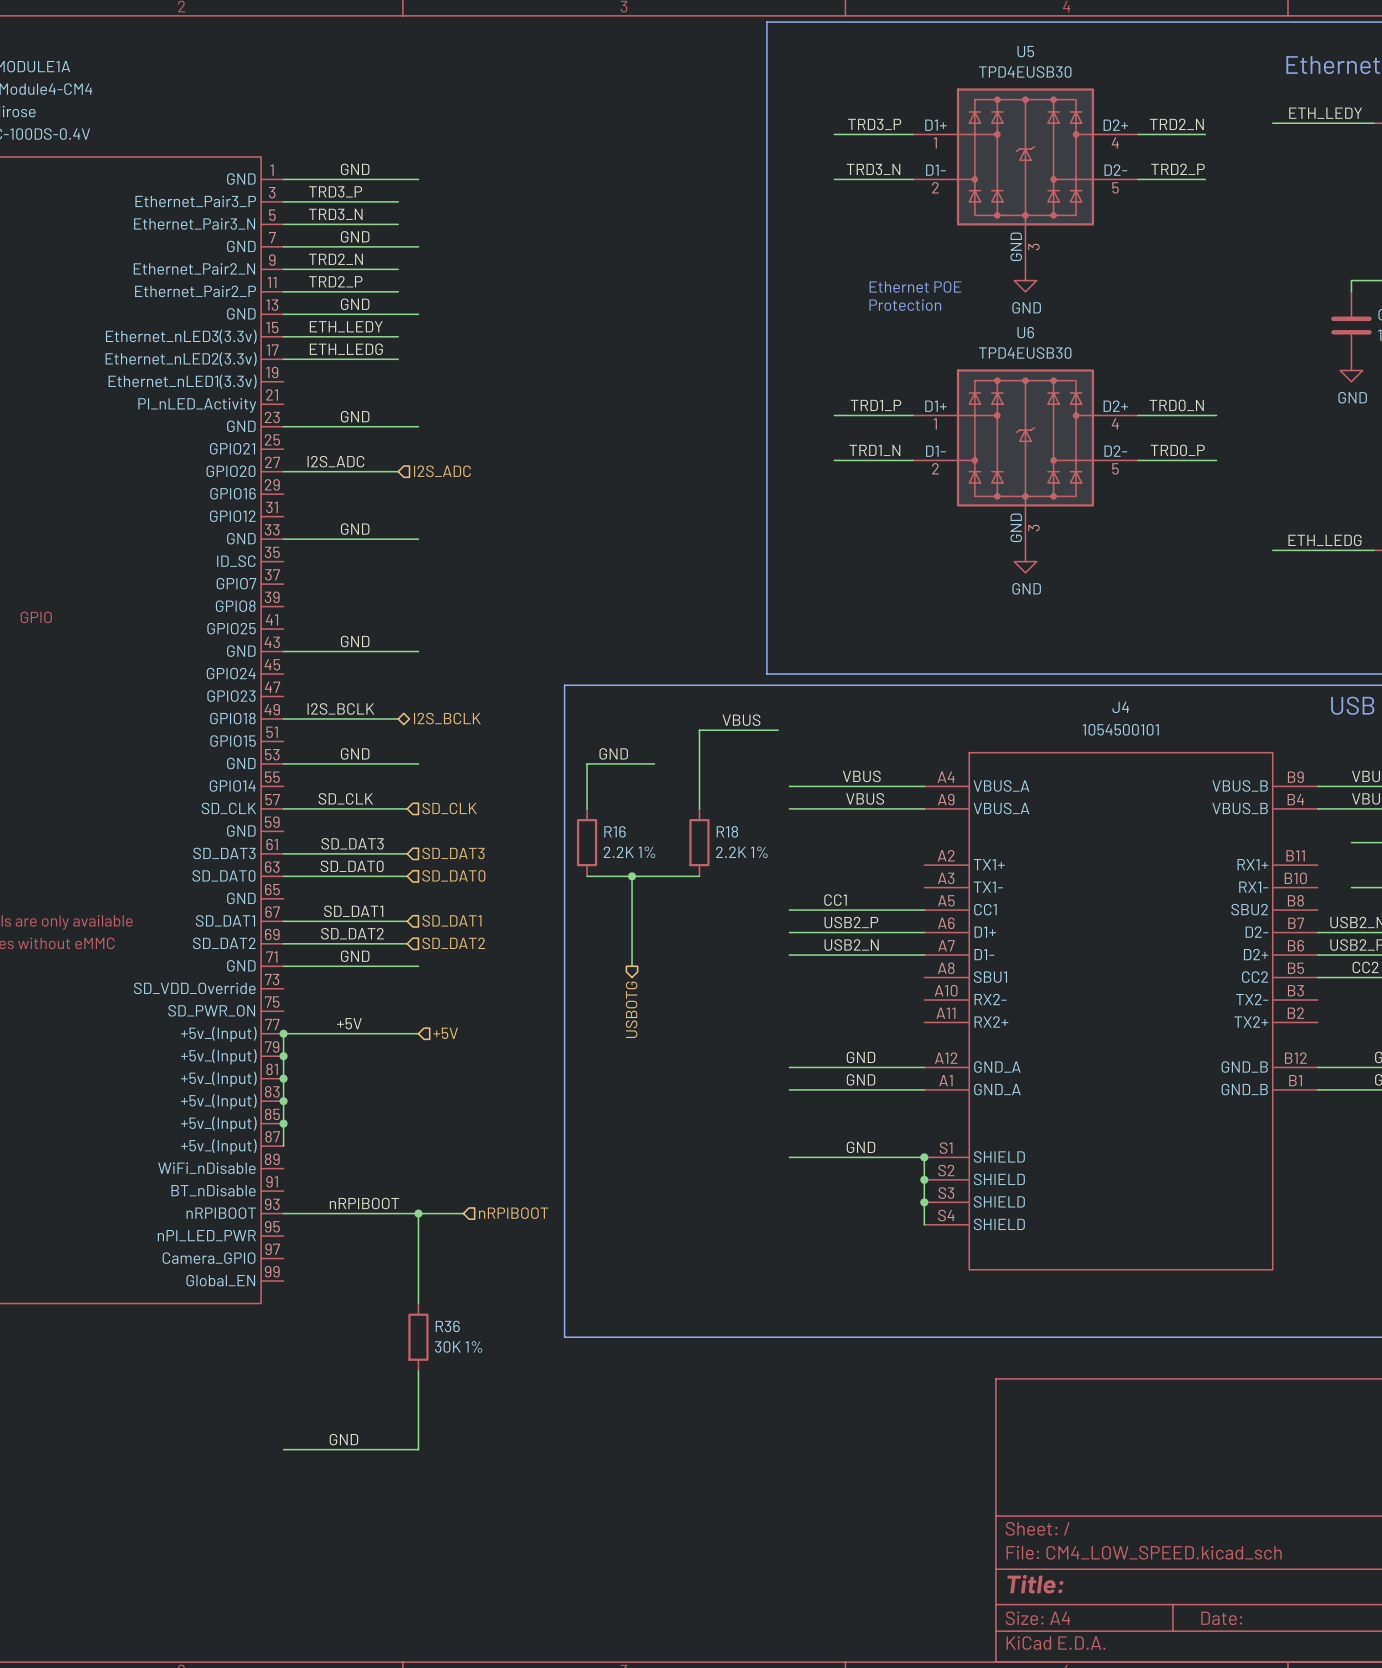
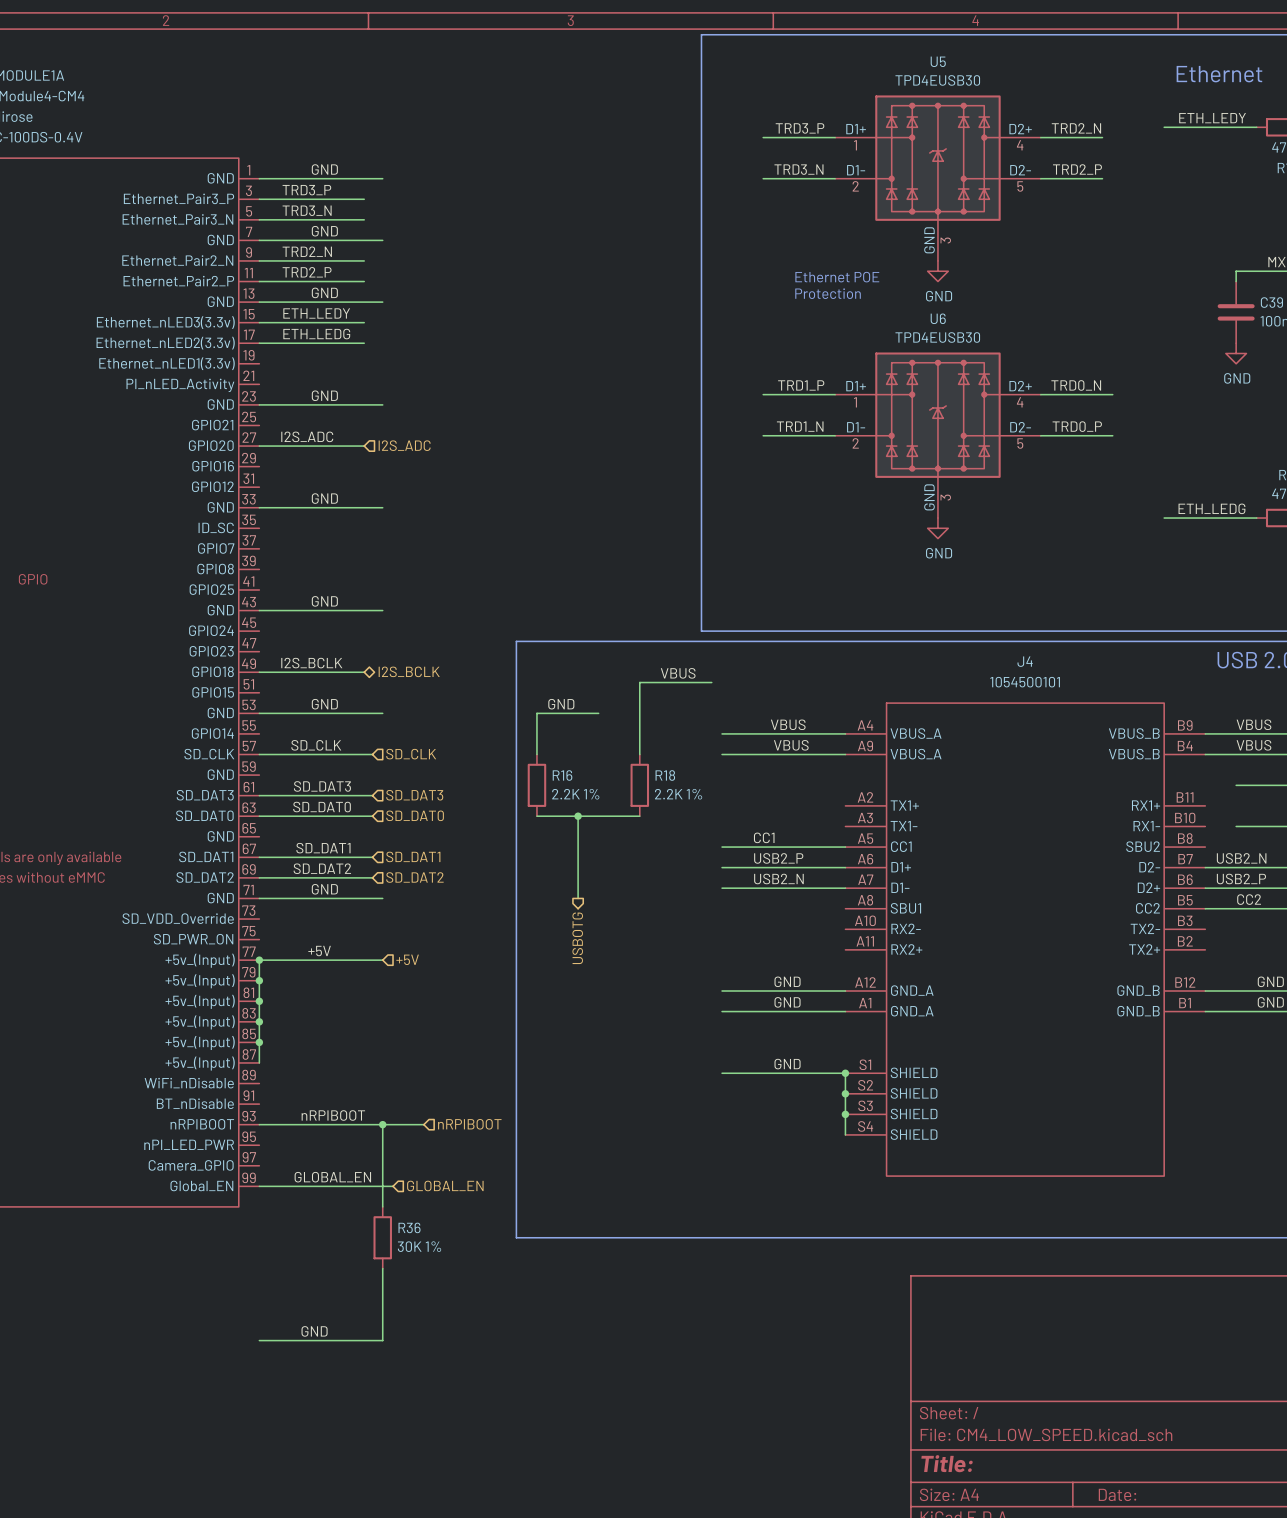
label: none -> GLOBAL_EN (332, 1177)
hierarchical label: none -> GLOBAL_EN (445, 1185)
wire: none -> (259, 1186) (393, 1186)

